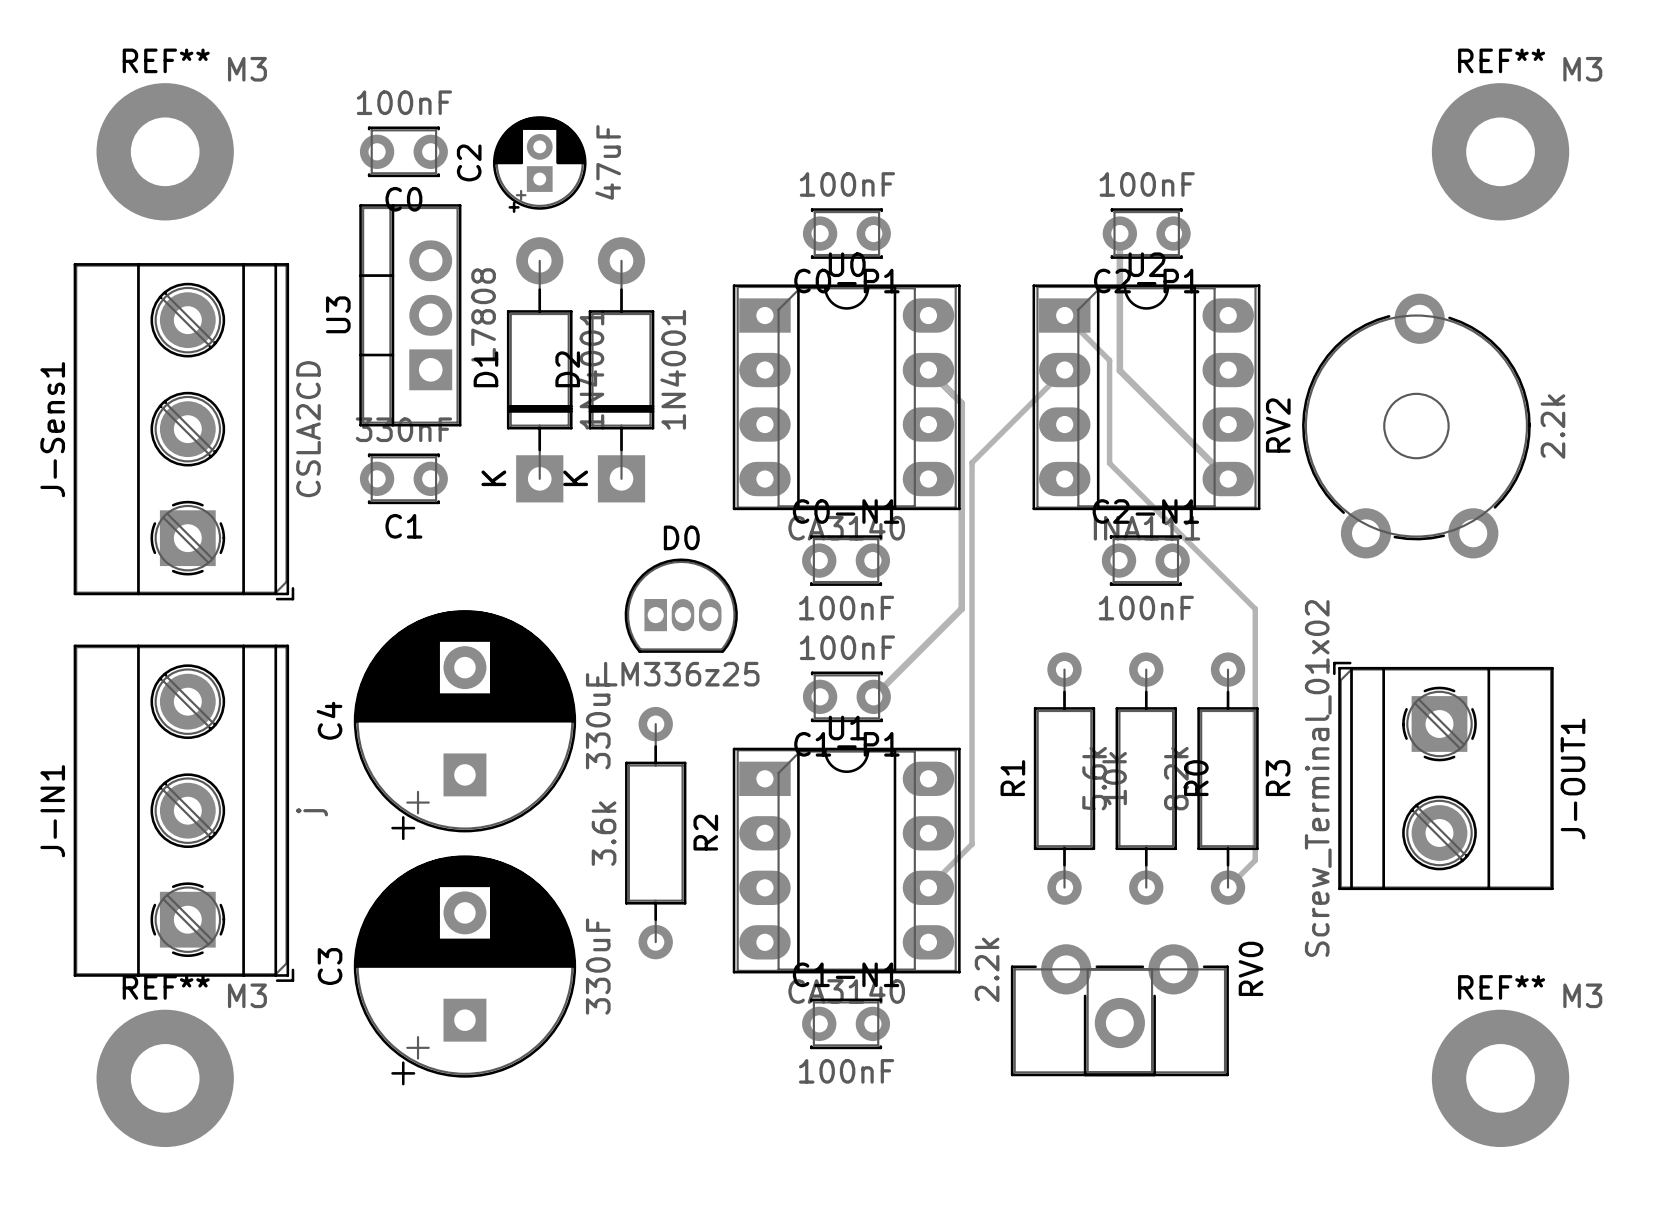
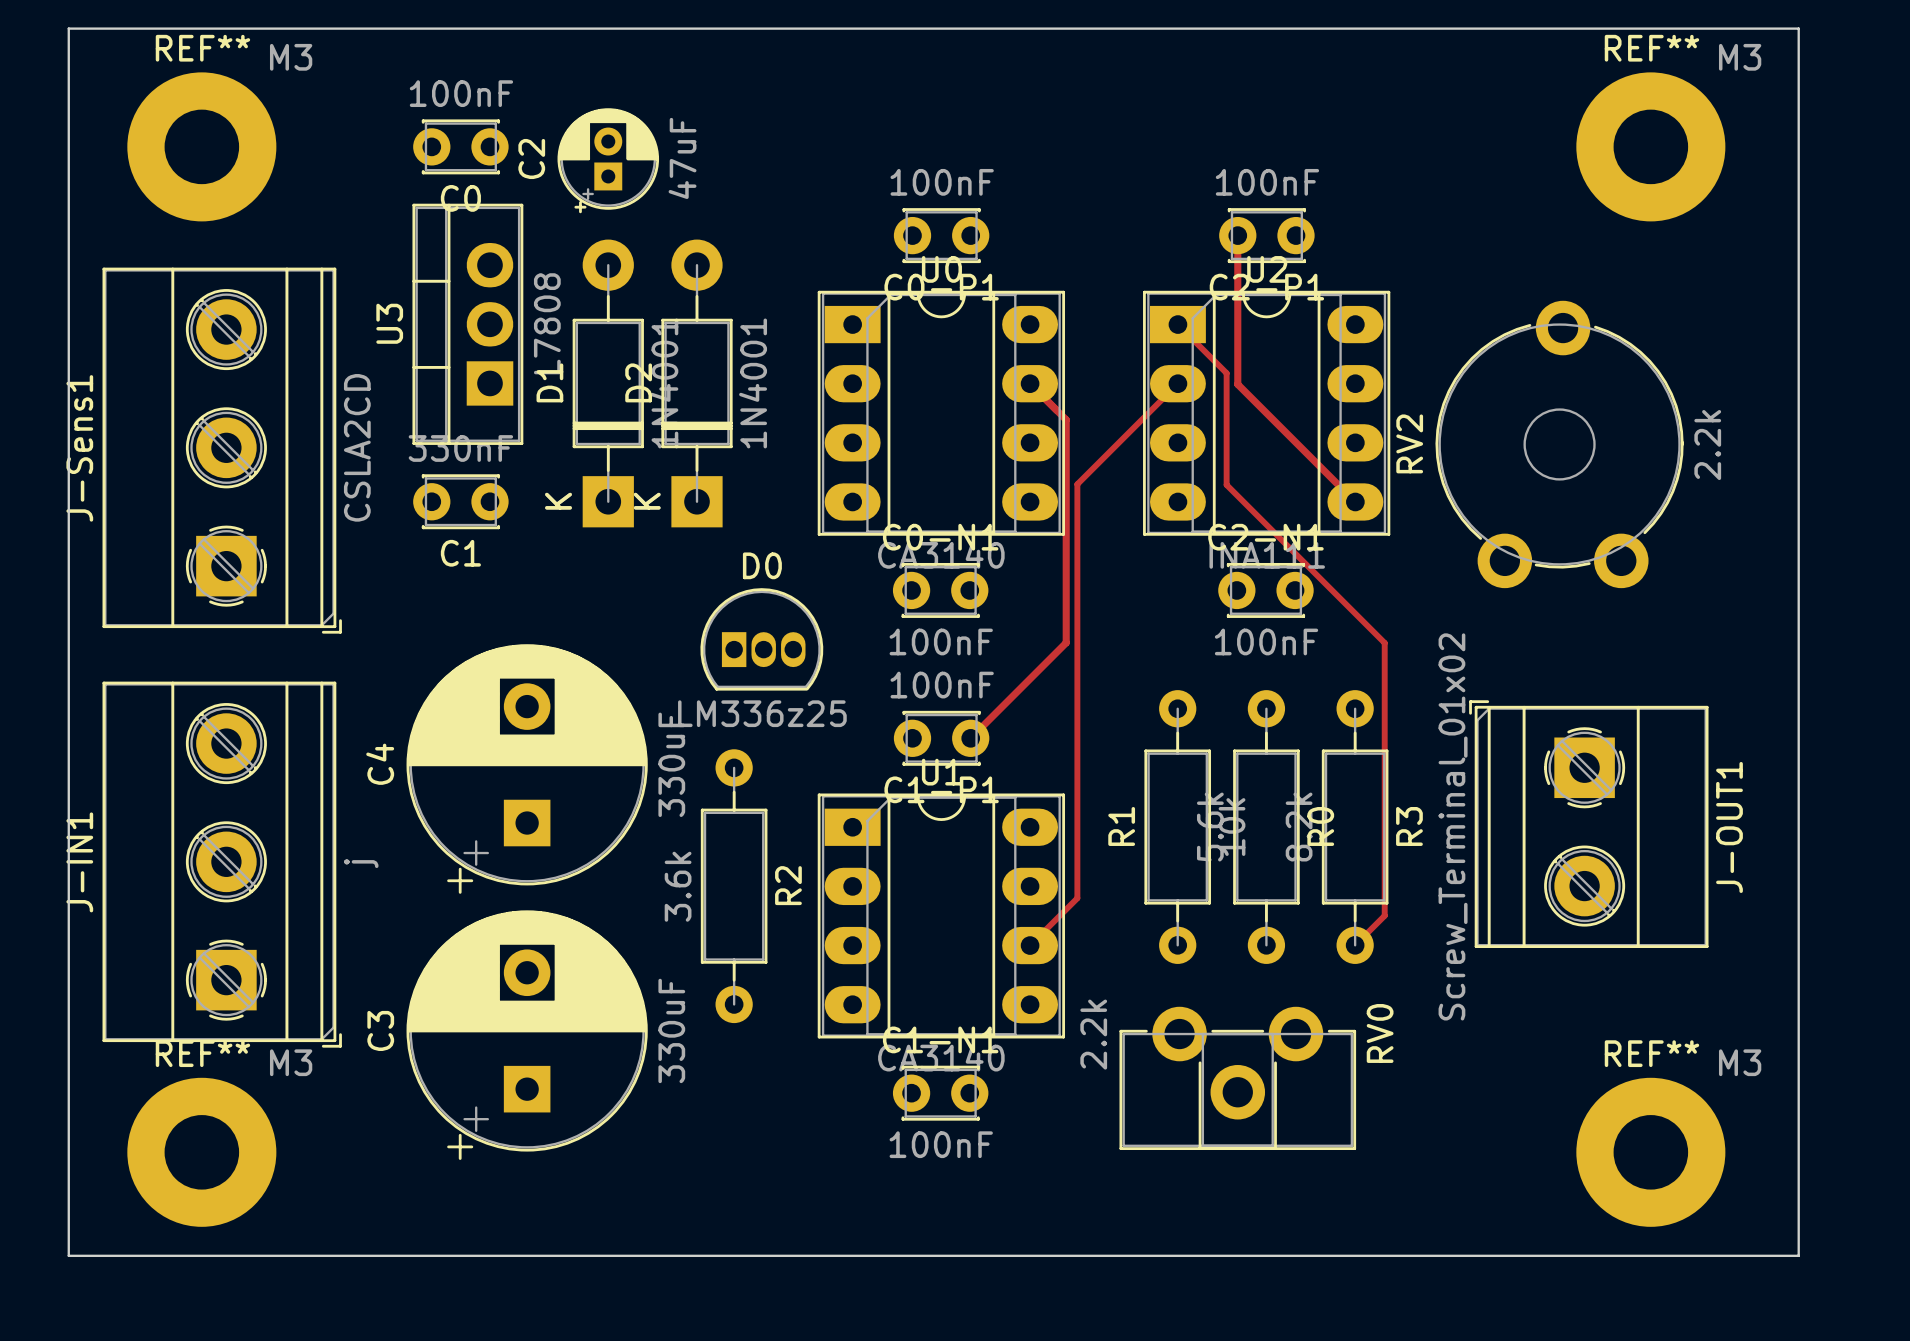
board edge: none -> (68, 28) (68, 1255) (1798, 1255) (1798, 28) (68, 28)

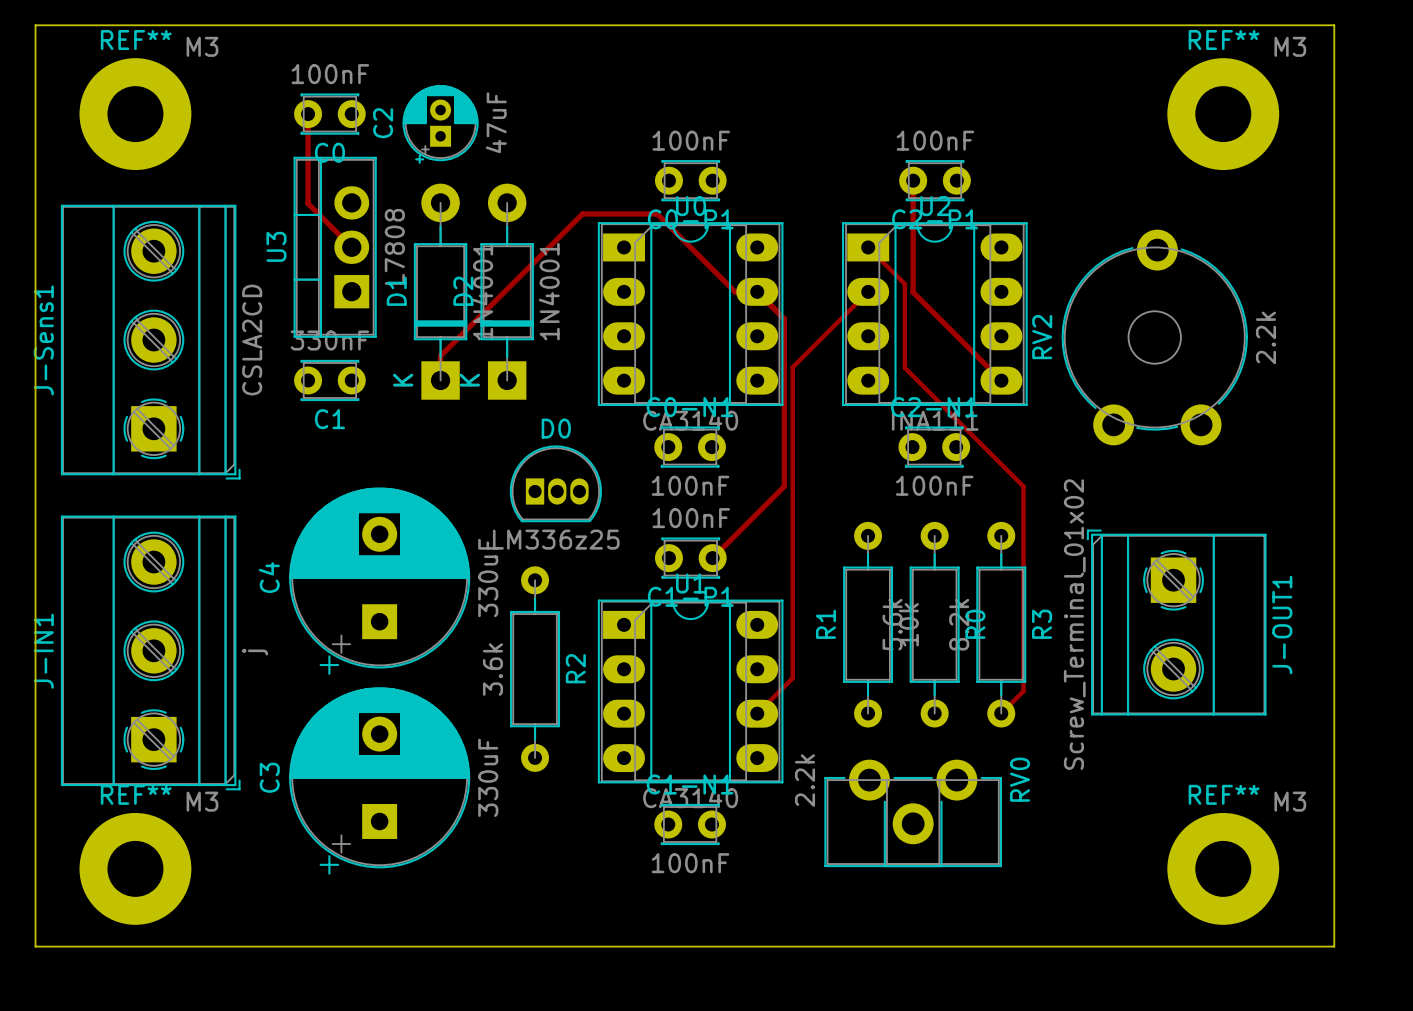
track: none -> (308, 114) (308, 203) (351, 247)
track: none -> (757, 291) (735, 291) (657, 213) (582, 213) (440, 355) (440, 380)

